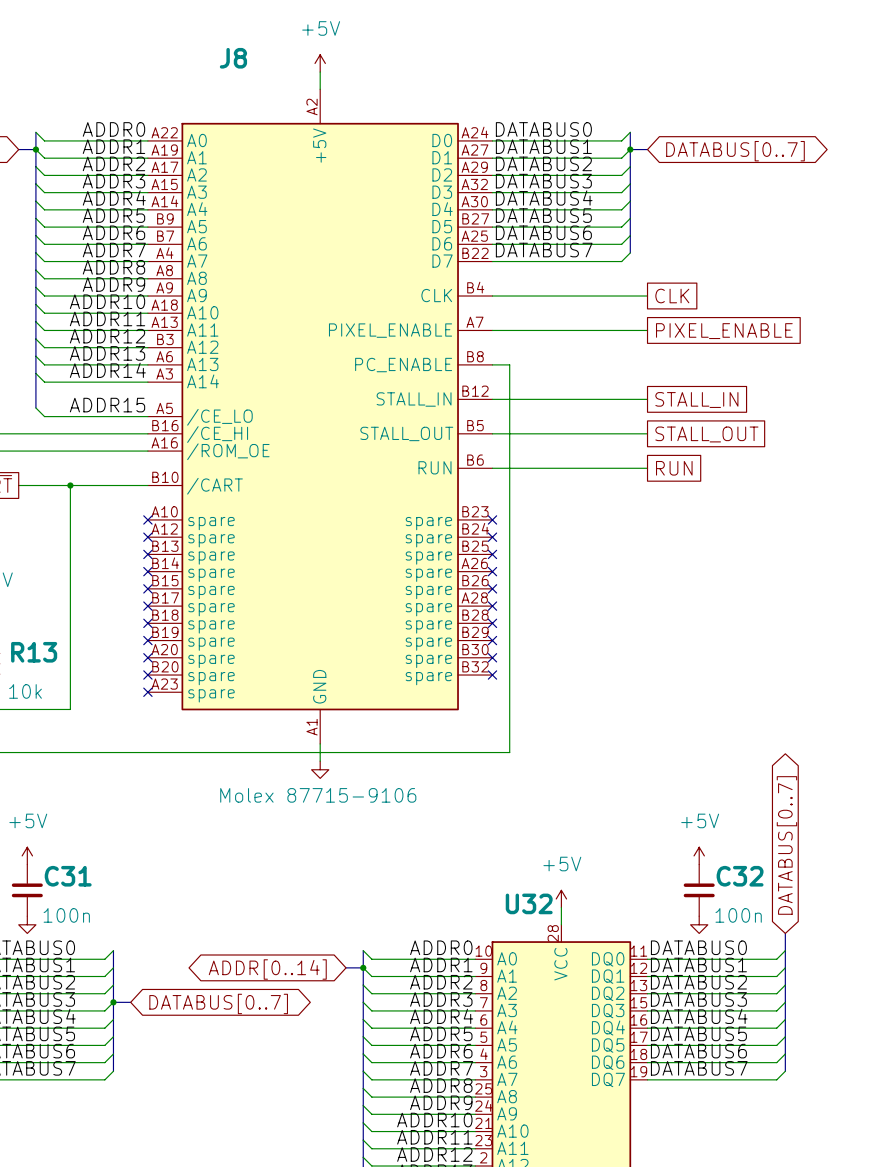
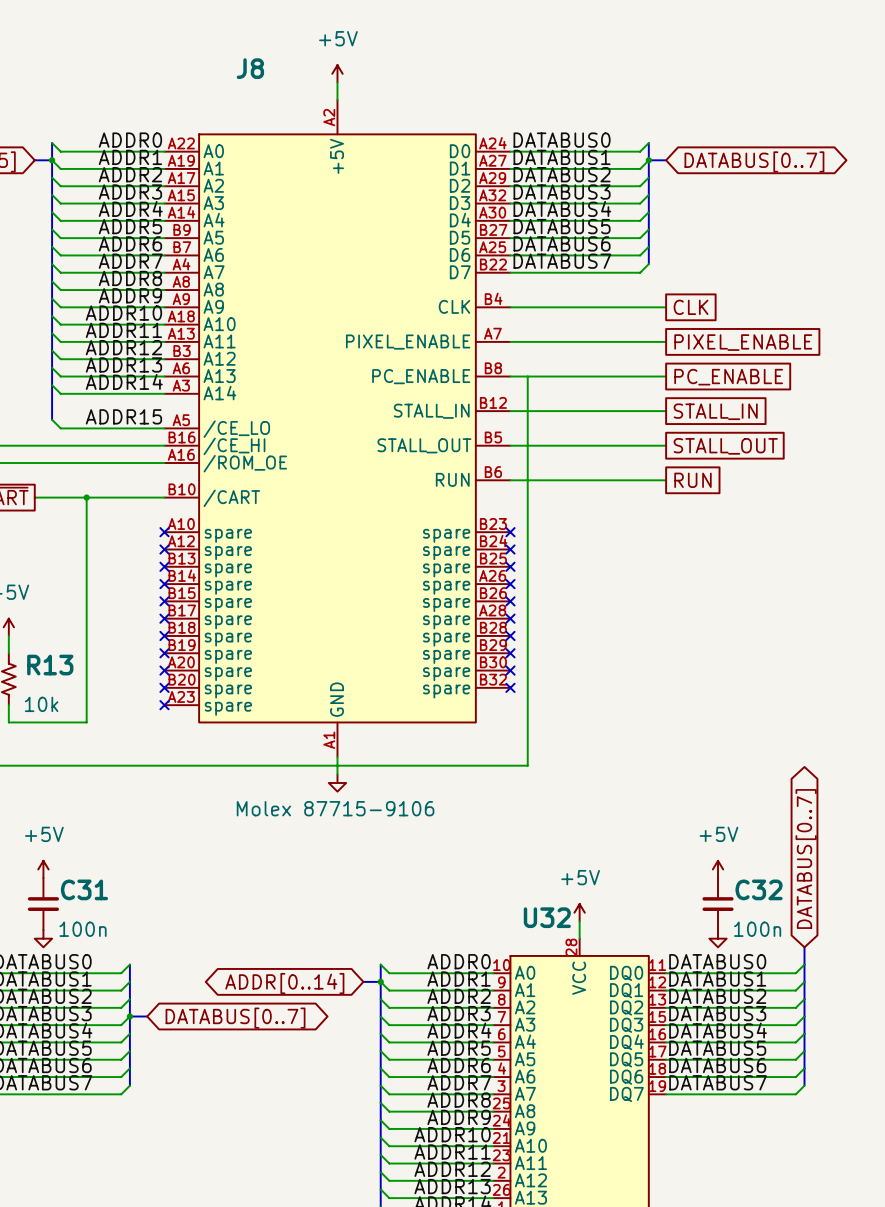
wire: none -> (527, 376) (666, 376)
global label: none -> PC_ENABLE (728, 377)

